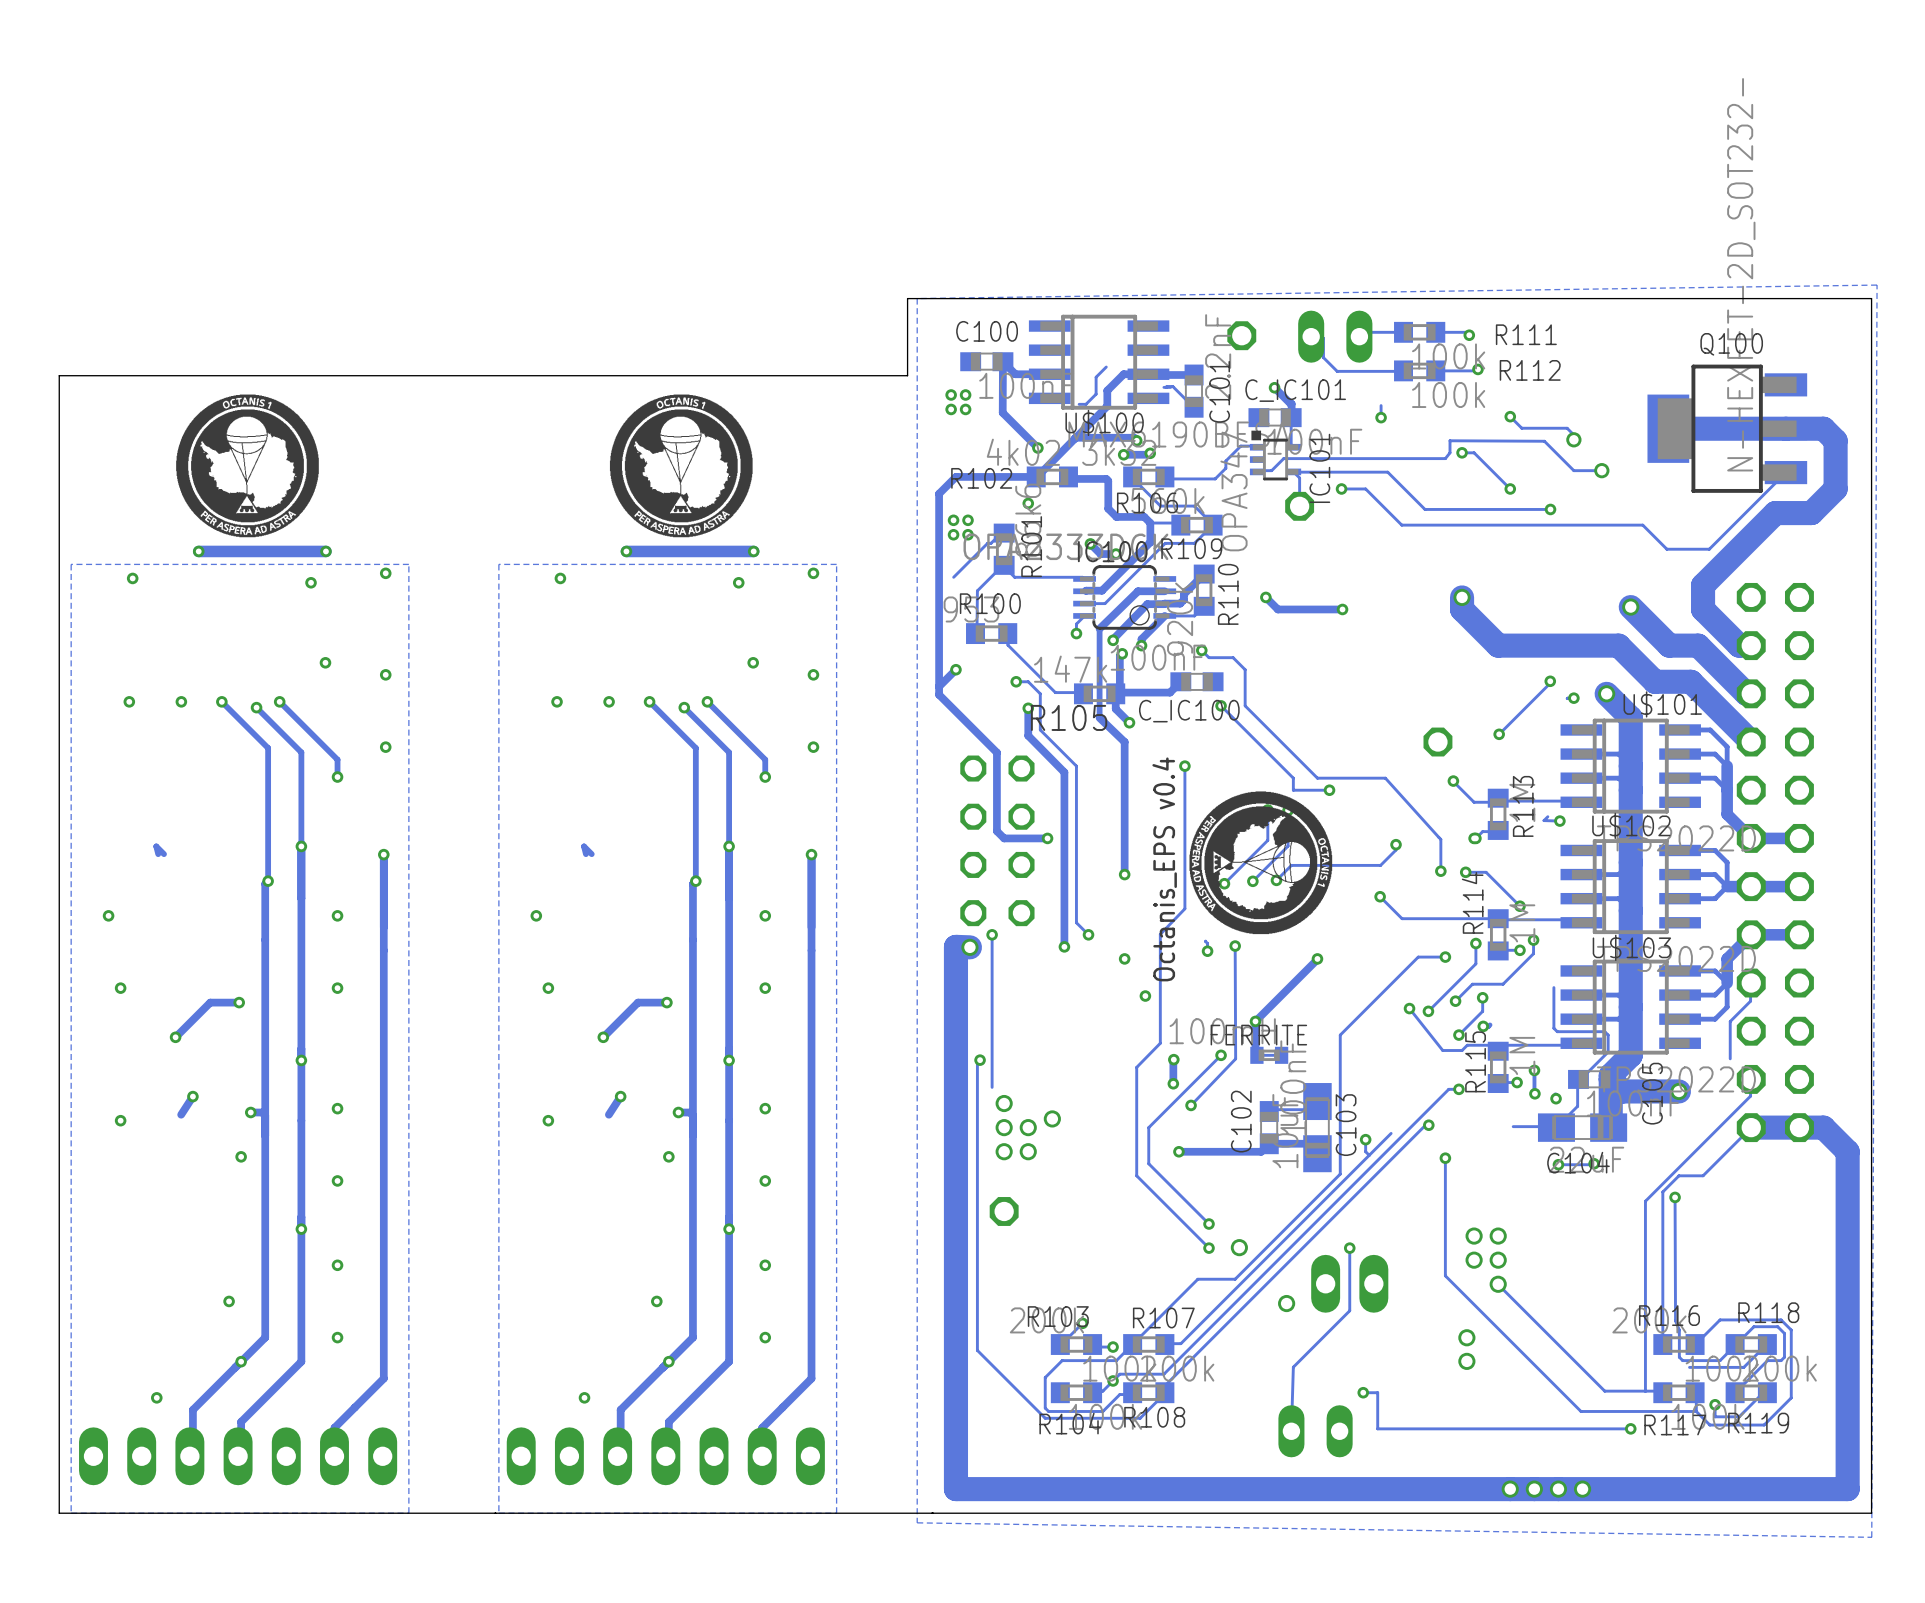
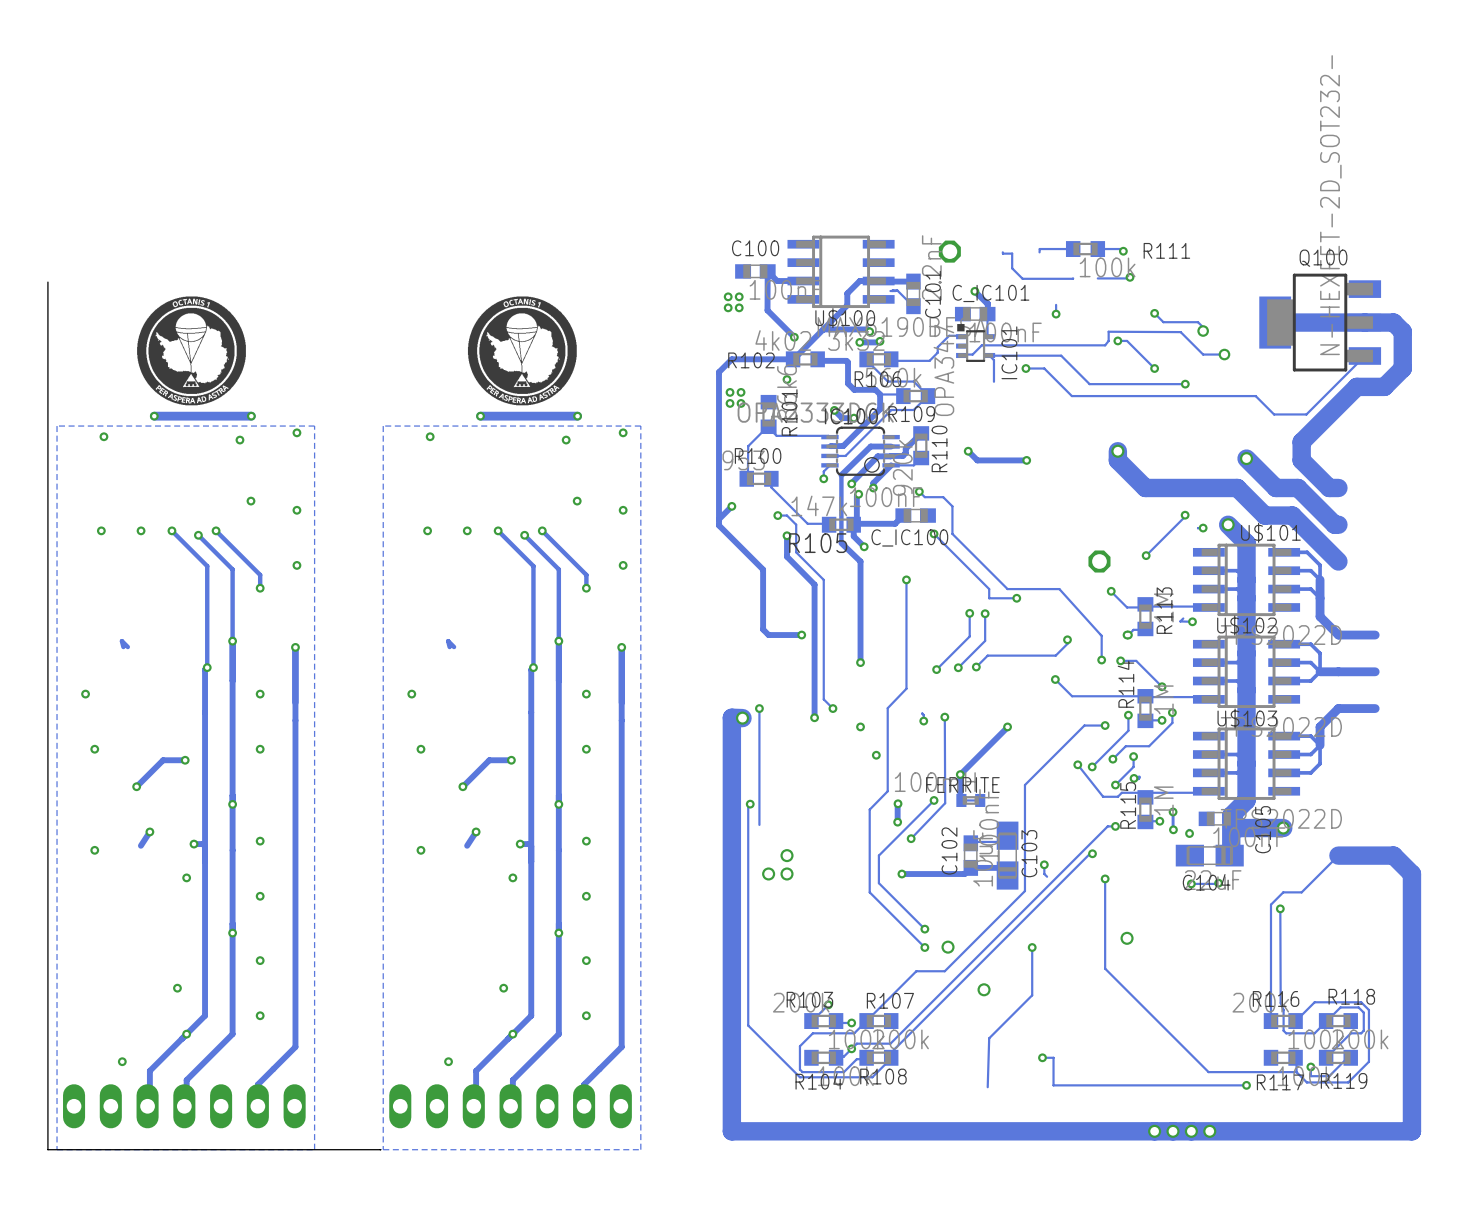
zone outline: (1877, 285) (1871, 1537) (917, 1522) (917, 298) (1877, 285) -> none
part: (1335, 336) -> none
track: (1106, 367) (1096, 377) (1096, 394) (1085, 404) (1079, 404) -> none
R112: 100k (1419, 370) -> none
board edge: (59, 375) (907, 375) (907, 298) (1871, 298) (1871, 1513) (495, 1513) -> none
part: (1299, 506) -> none
track: (1004, 533) (1001, 533) (990, 543) (987, 543) (953, 577) -> none
drawing: [1189, 791, 1333, 935] -> none
part: (997, 840) -> none
part: (1775, 862) -> none
text: Octanis_EPS v0.4 (1164, 869) -> none
track: (1751, 983) (1750, 1001) (1730, 1021) (1730, 1058) -> none
track: (1553, 987) (1553, 1028) (1557, 1031) (1604, 1031) (1608, 1035) (1608, 1052) (1581, 1079) (1578, 1079) (1577, 1106) (1556, 1127) (1513, 1126) -> none
track: (1750, 1079) (1750, 1096) (1645, 1201) (1645, 1391) -> none
via: (1004, 1103) -> none
via: (1052, 1118) -> none
via: (1004, 1127) -> none
track: (1391, 1133) (1180, 1343) (1164, 1344) -> none
part: (1004, 1211) -> none
via: (1498, 1236) -> none
via: (1474, 1260) -> none
via: (1498, 1260) -> none
part: (1349, 1283) -> none
track: (1498, 1284) (1604, 1391) (1662, 1391) (1662, 1392) (1665, 1391) -> none
via: (1498, 1284) -> none
via: (1466, 1337) -> none
track: (1767, 1344) (1743, 1367) (1689, 1367) -> none
via: (1466, 1361) -> none
part: (1315, 1431) -> none

